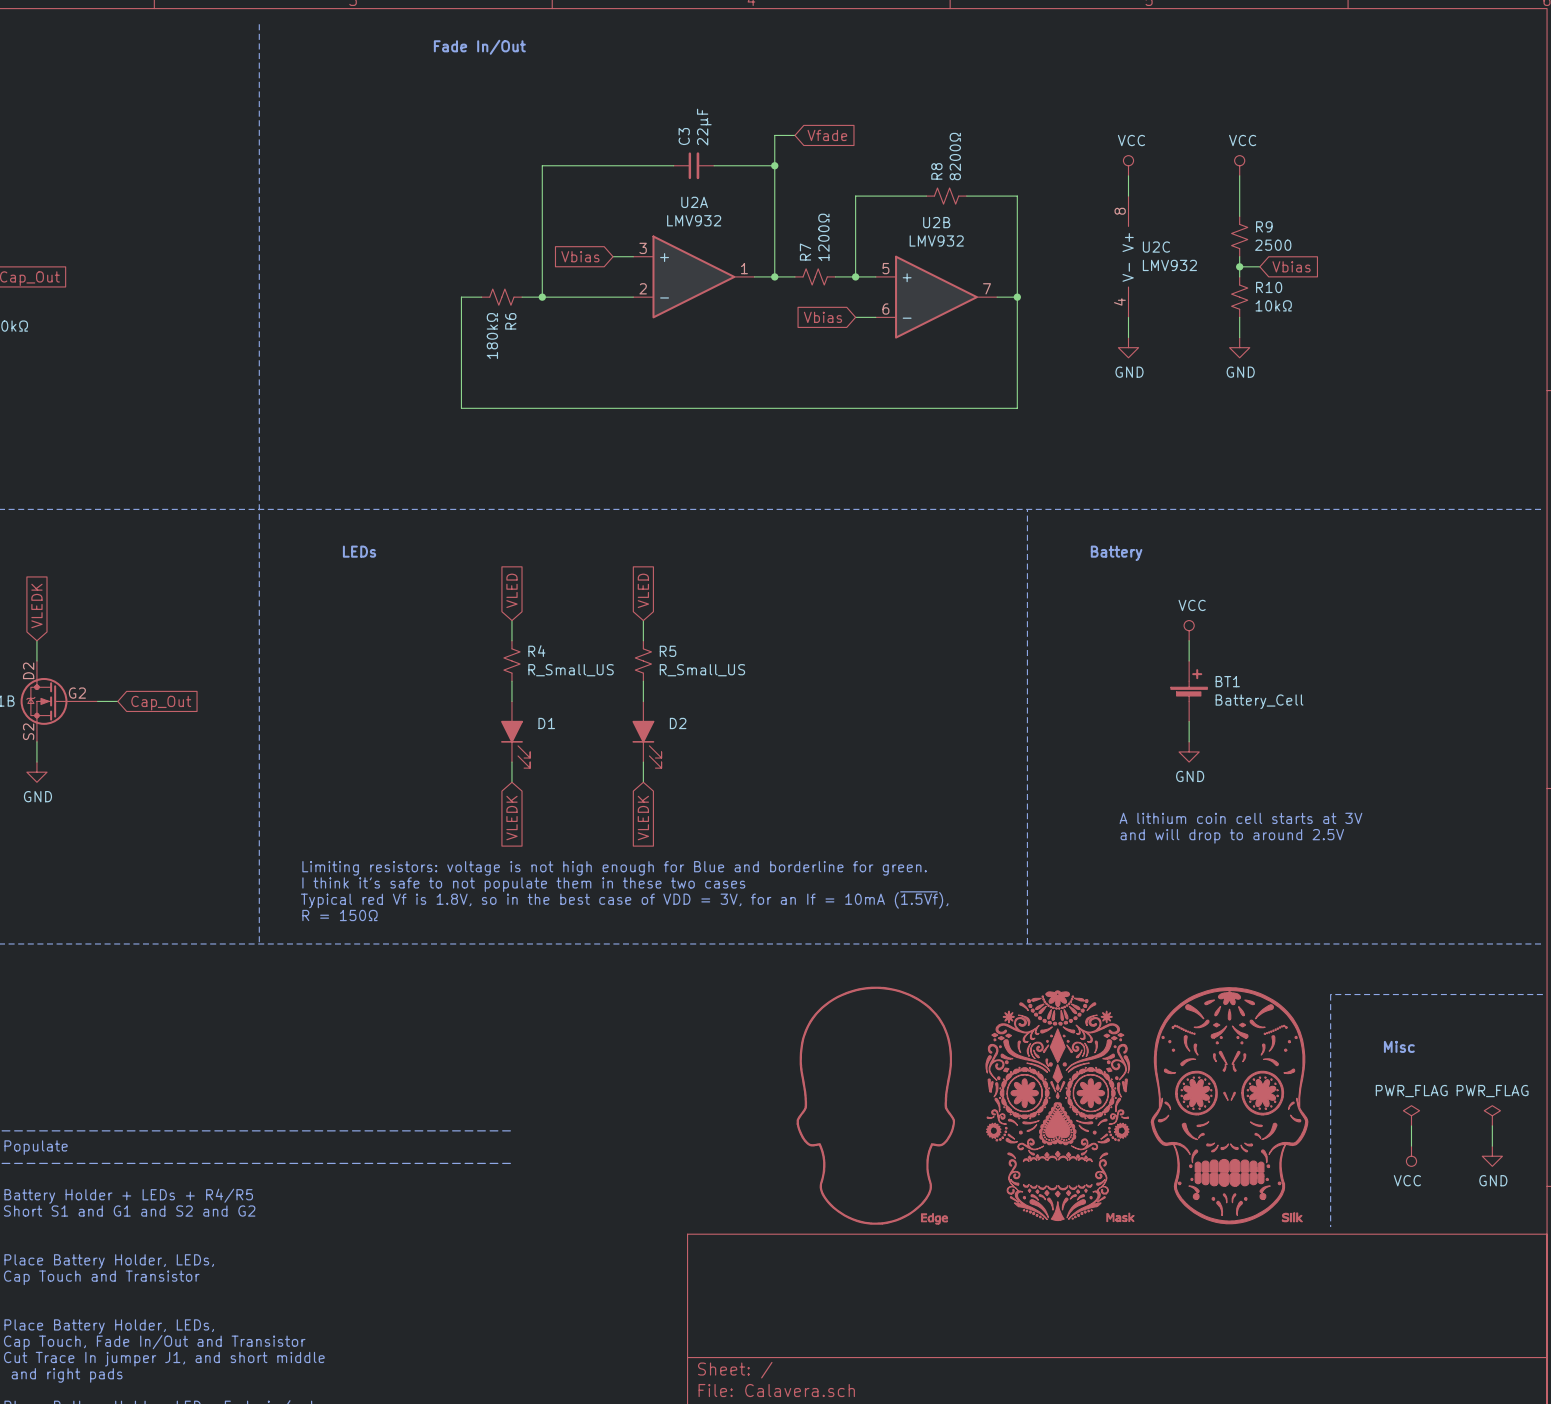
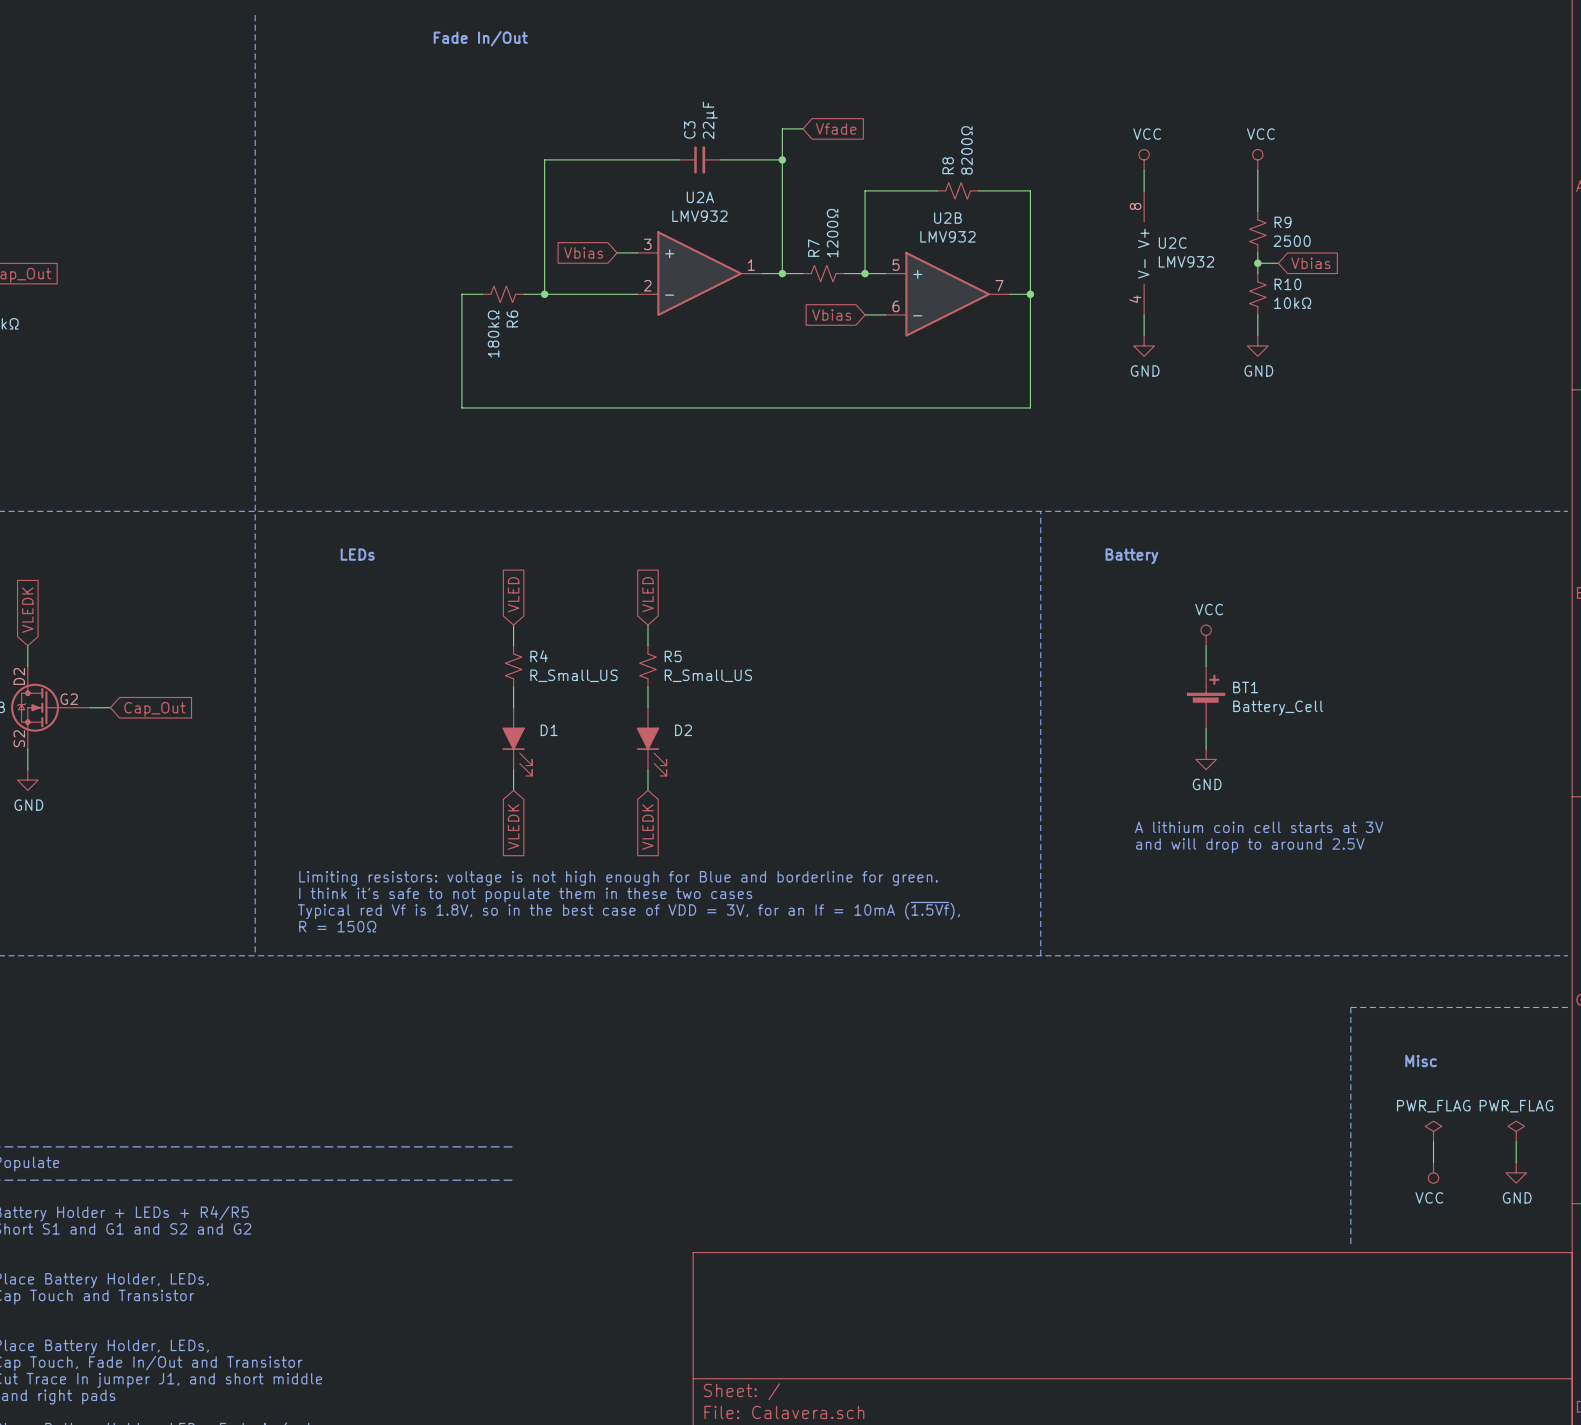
part: (875, 1105) -> none
part: (1229, 1105) -> none
part: (1060, 1106) -> none

